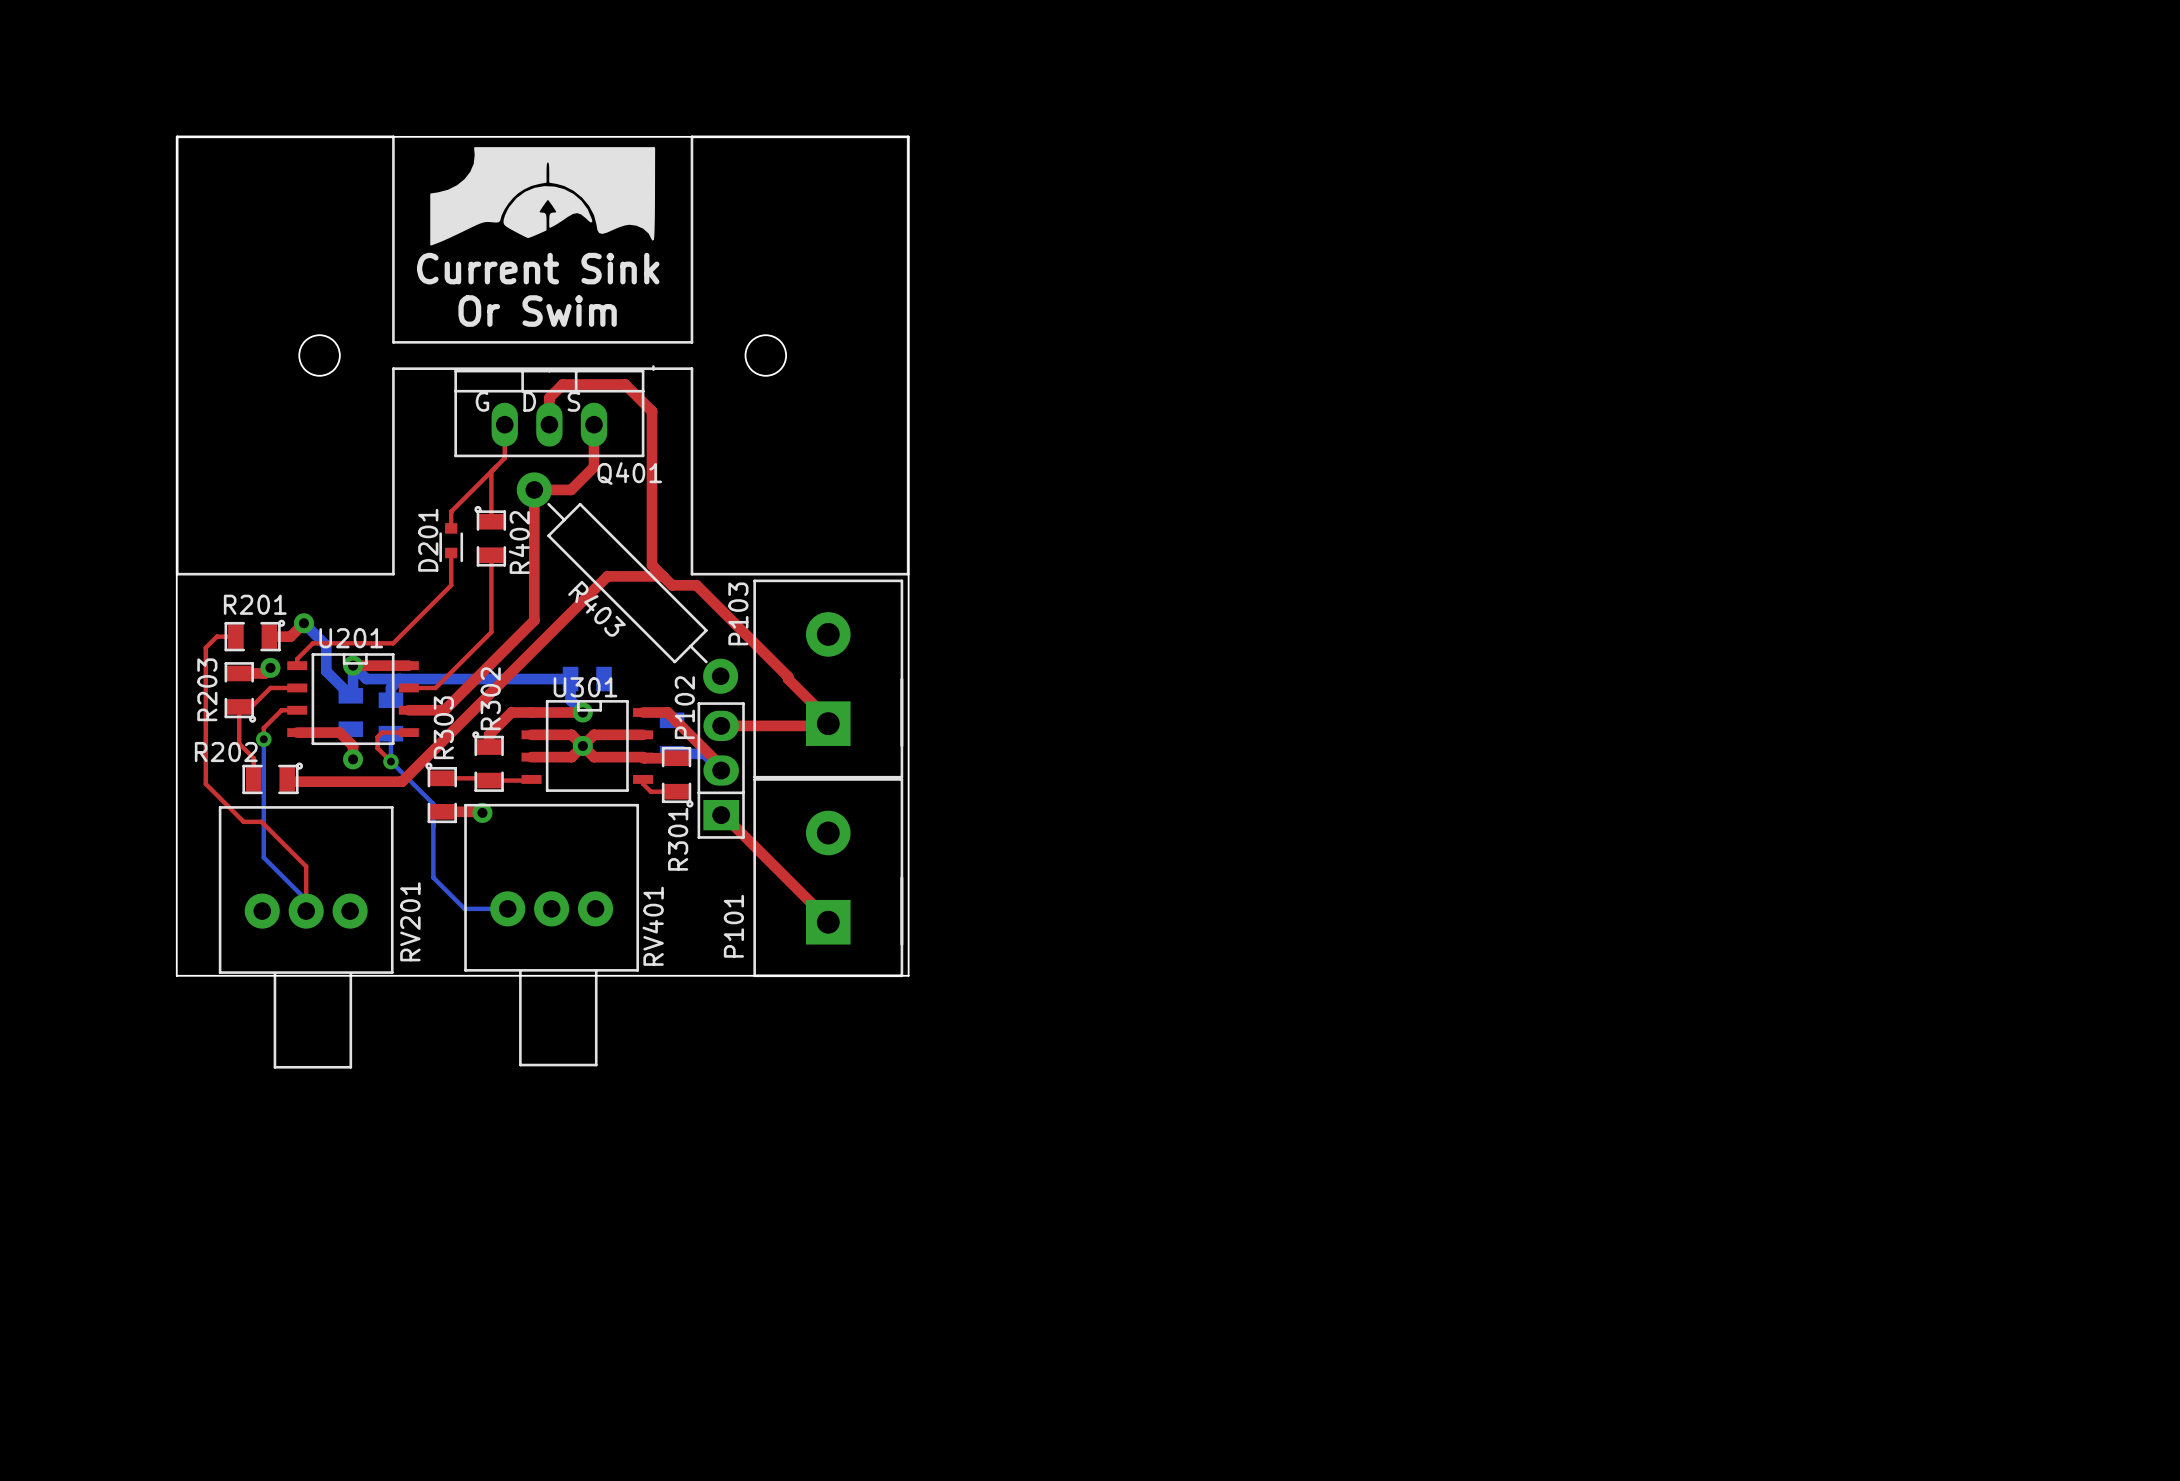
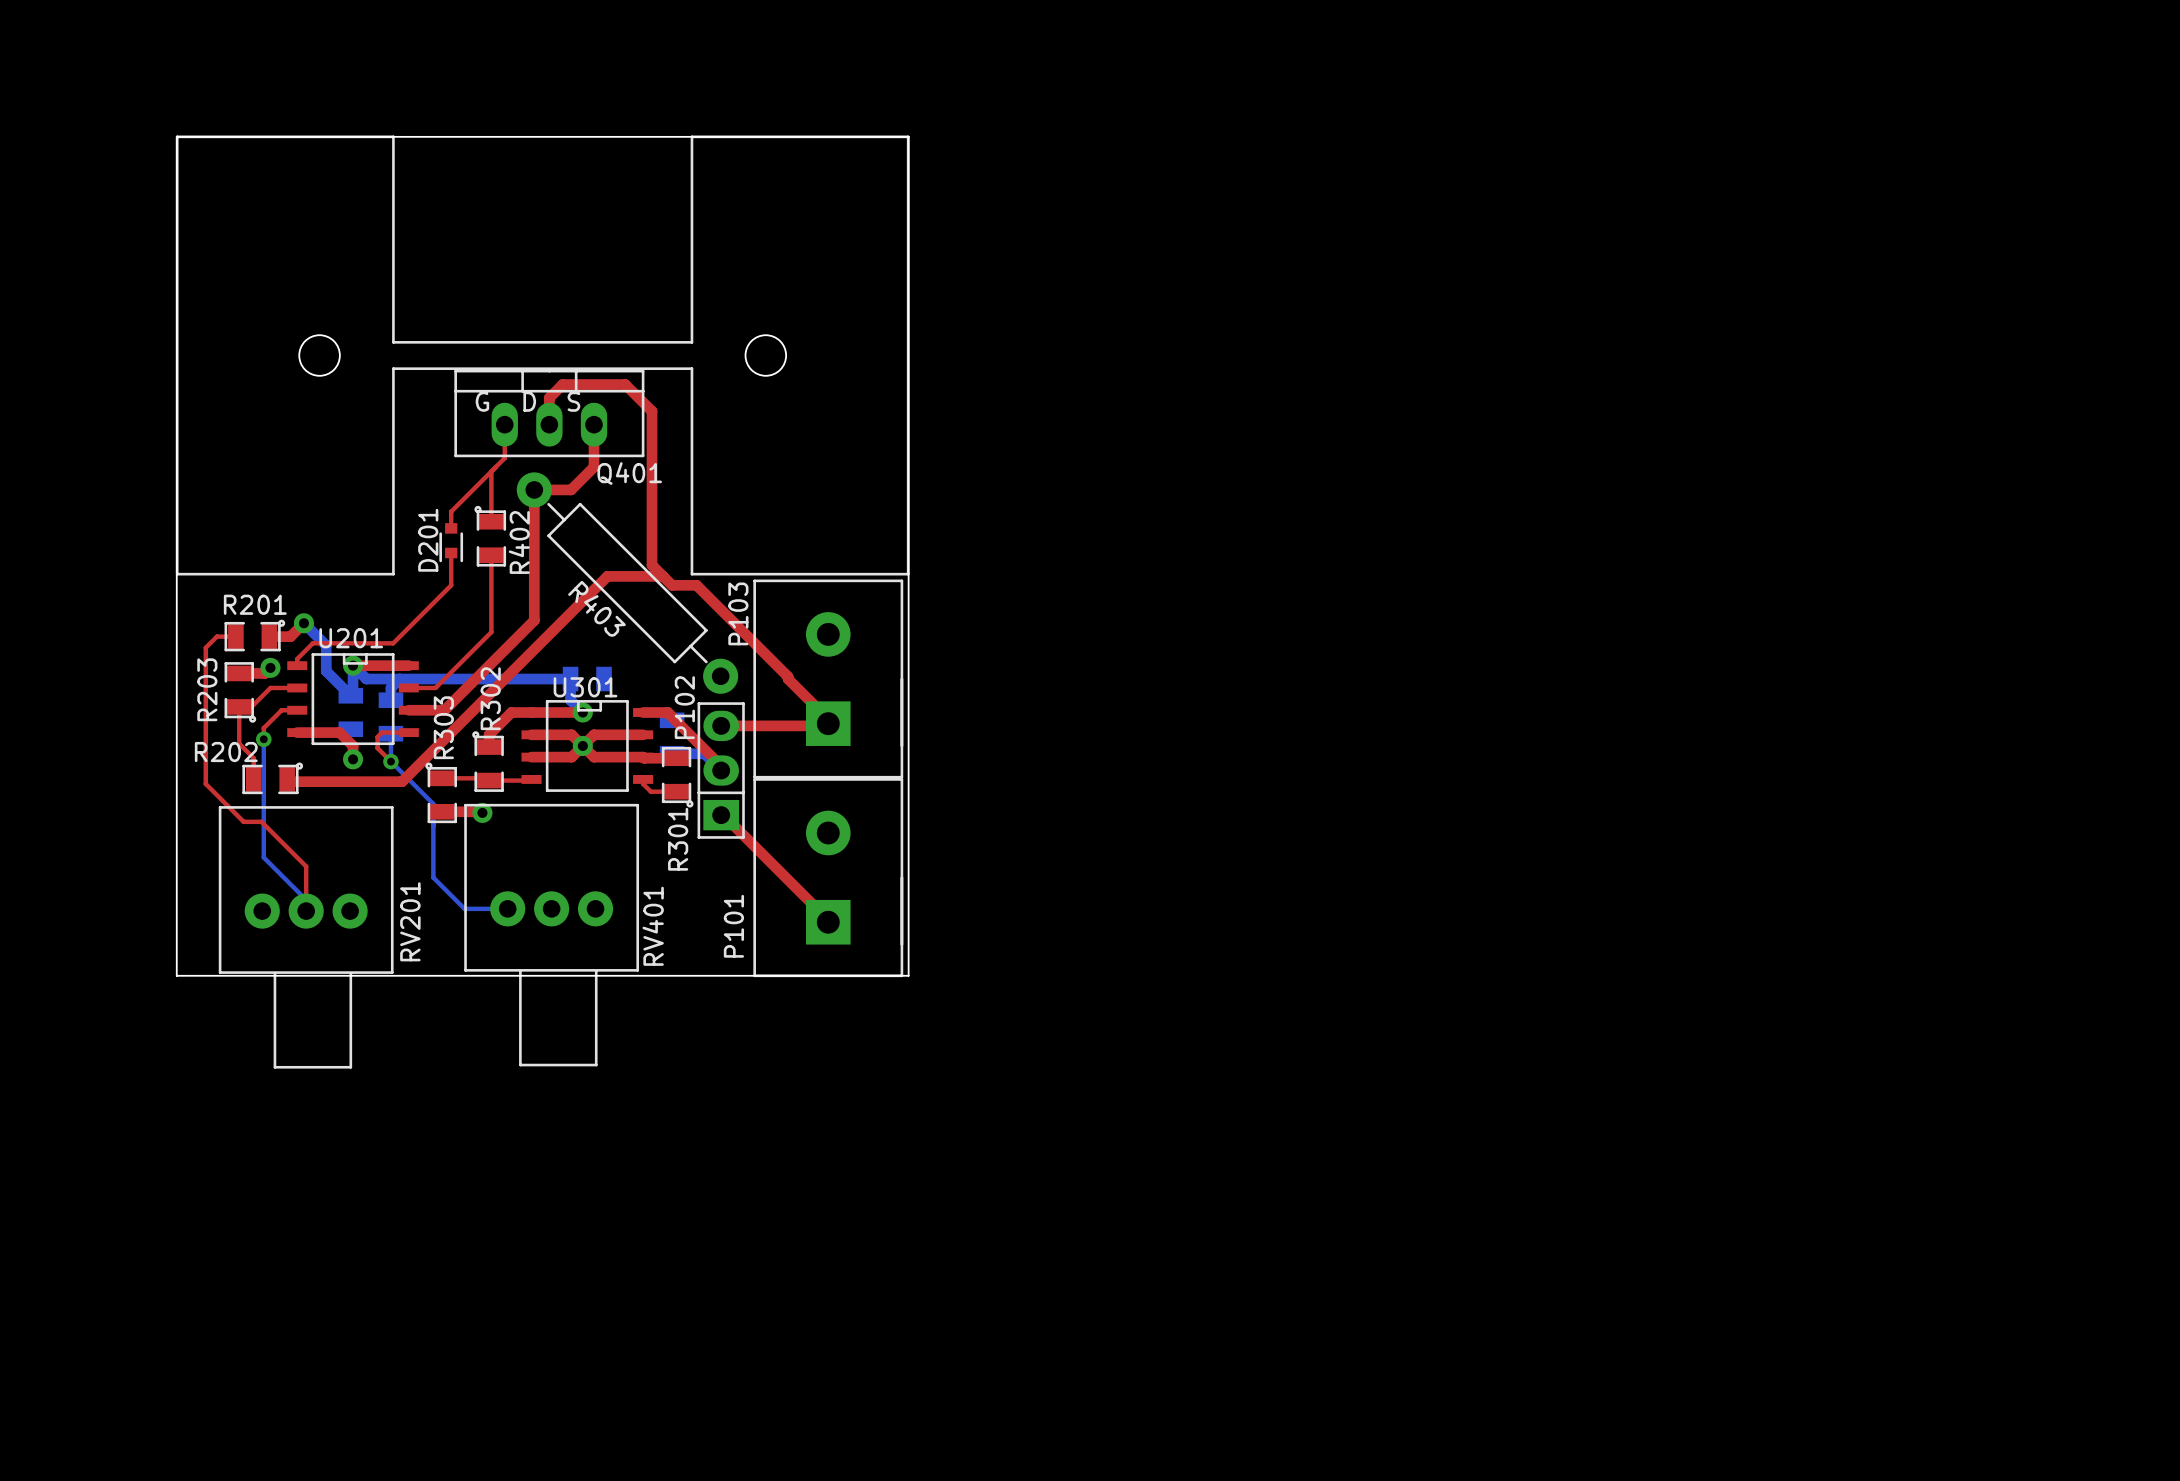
drawing: [430, 147, 656, 372] -> none
text: Current Sink (538, 268) -> none
text: Or Swim (537, 311) -> none

